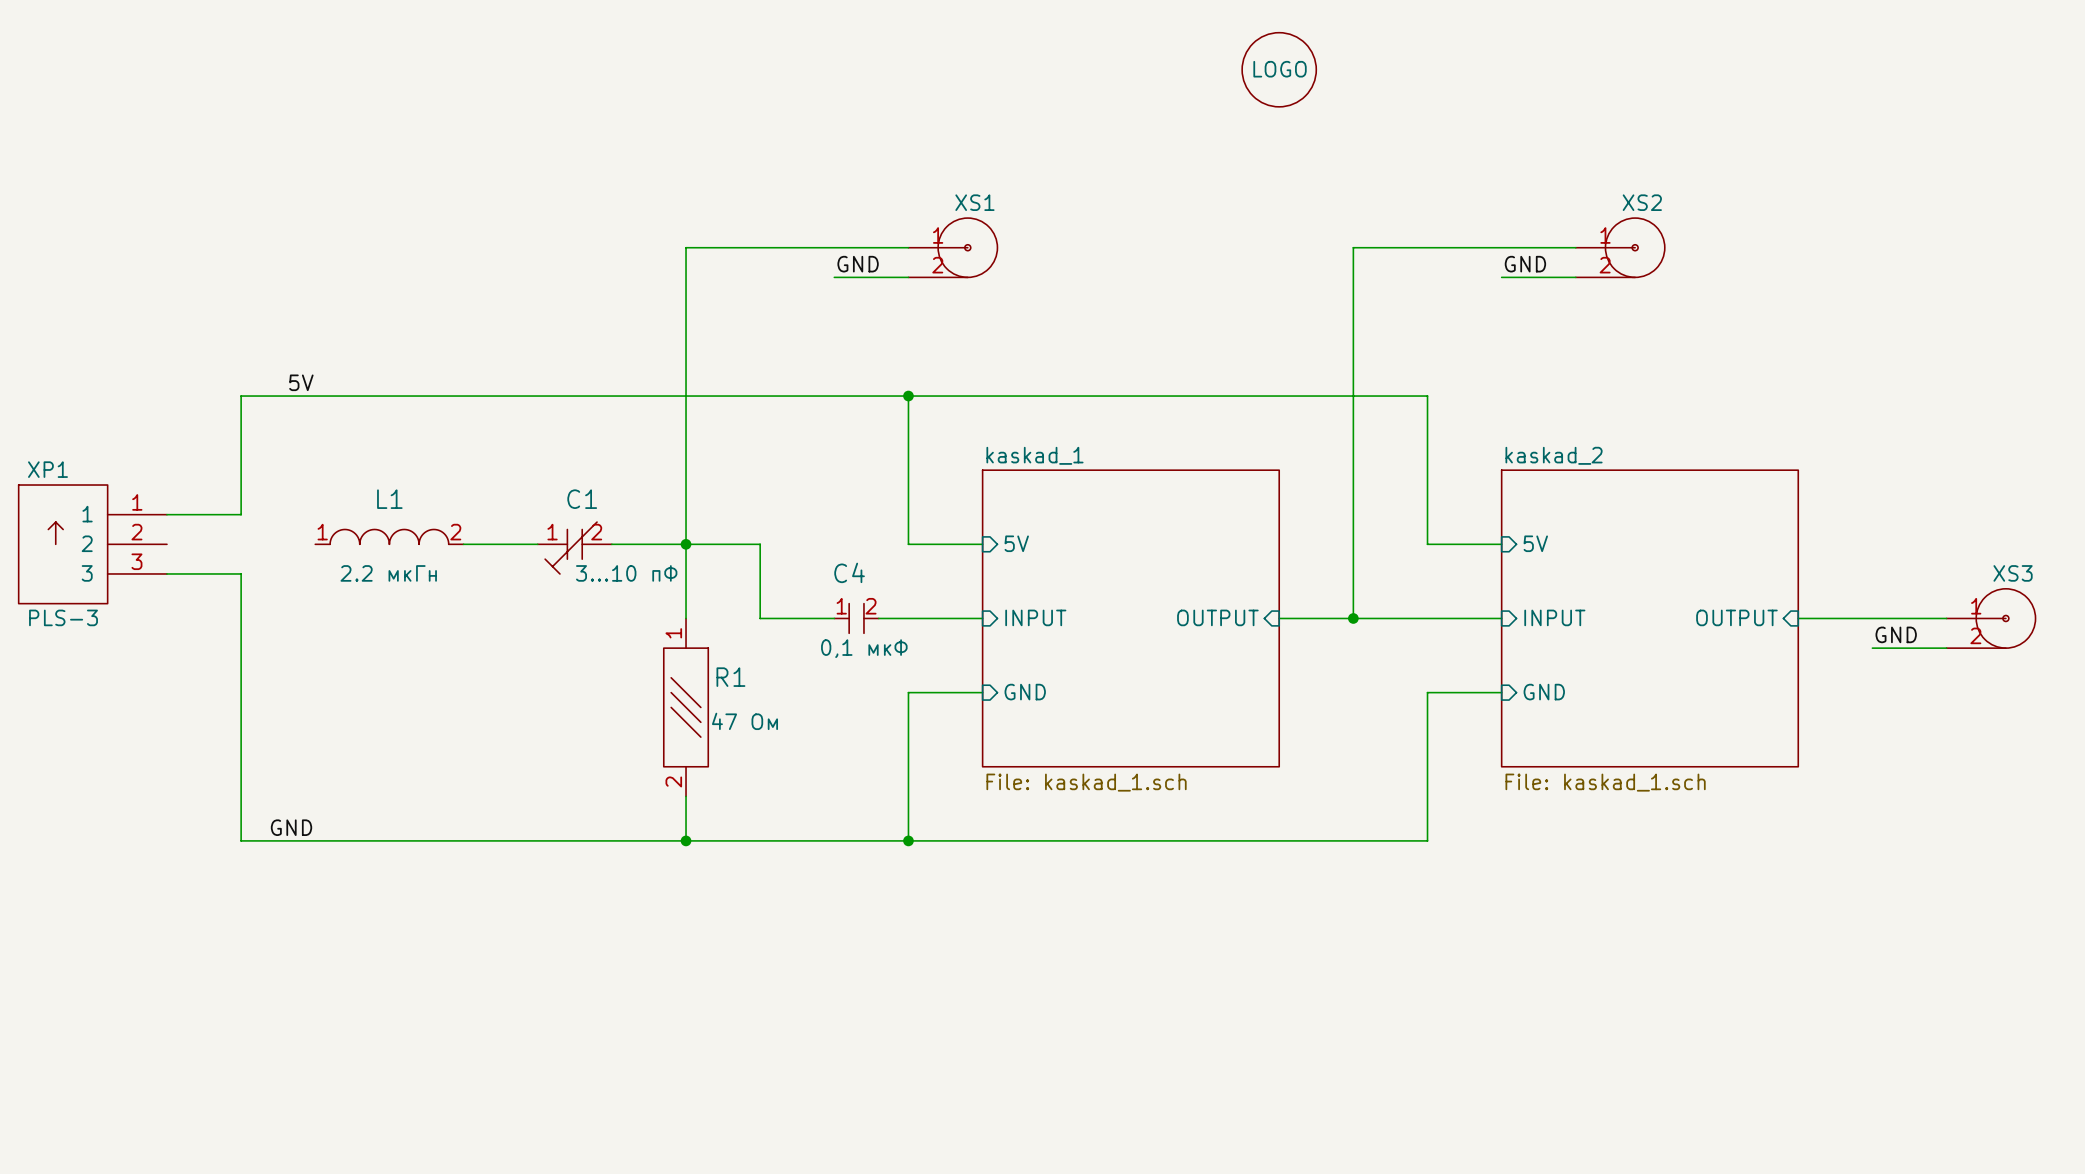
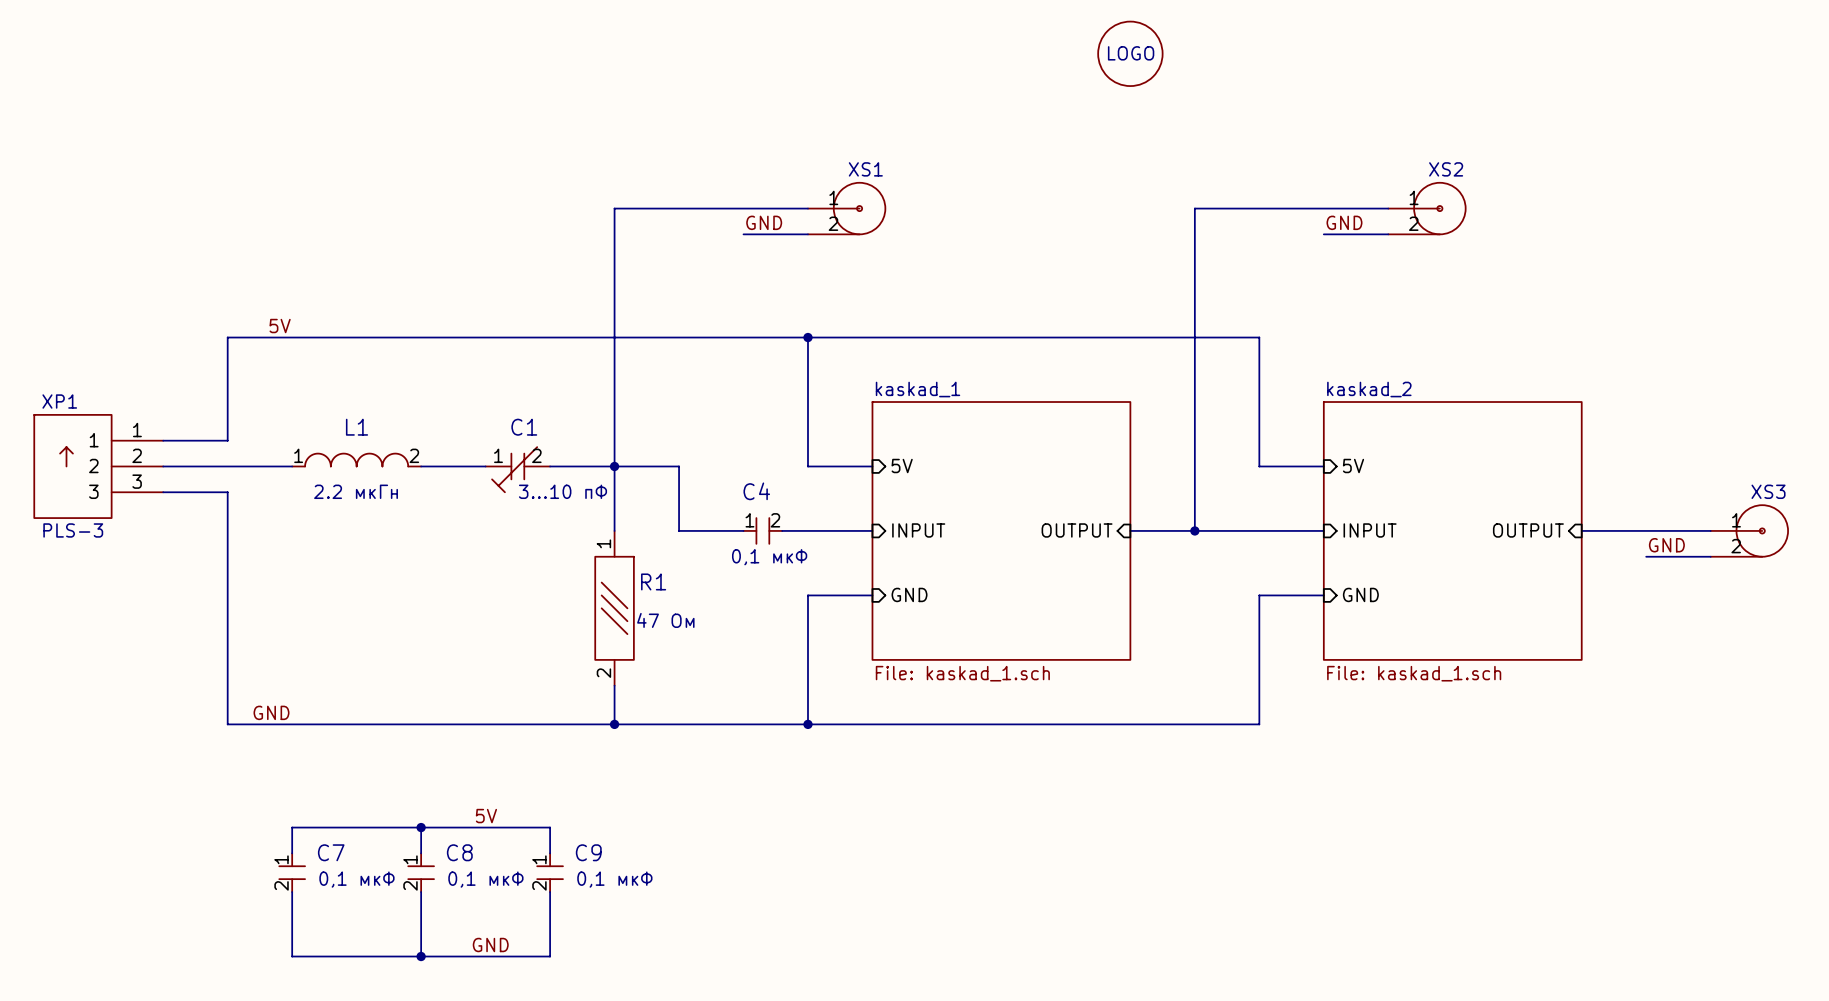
wire: none -> (163, 466) (292, 466)
label: none -> 5V (486, 816)
wire: none -> (421, 827) (421, 853)
junction: none -> (421, 827)
wire: none -> (292, 853) (292, 827) (550, 827) (550, 853)
C7: none -> (292, 872)
C8: none -> (421, 872)
C9: none -> (550, 872)
wire: none -> (292, 892) (292, 956) (550, 956) (550, 892)
wire: none -> (421, 892) (421, 956)
label: none -> GND (490, 945)
junction: none -> (421, 956)

